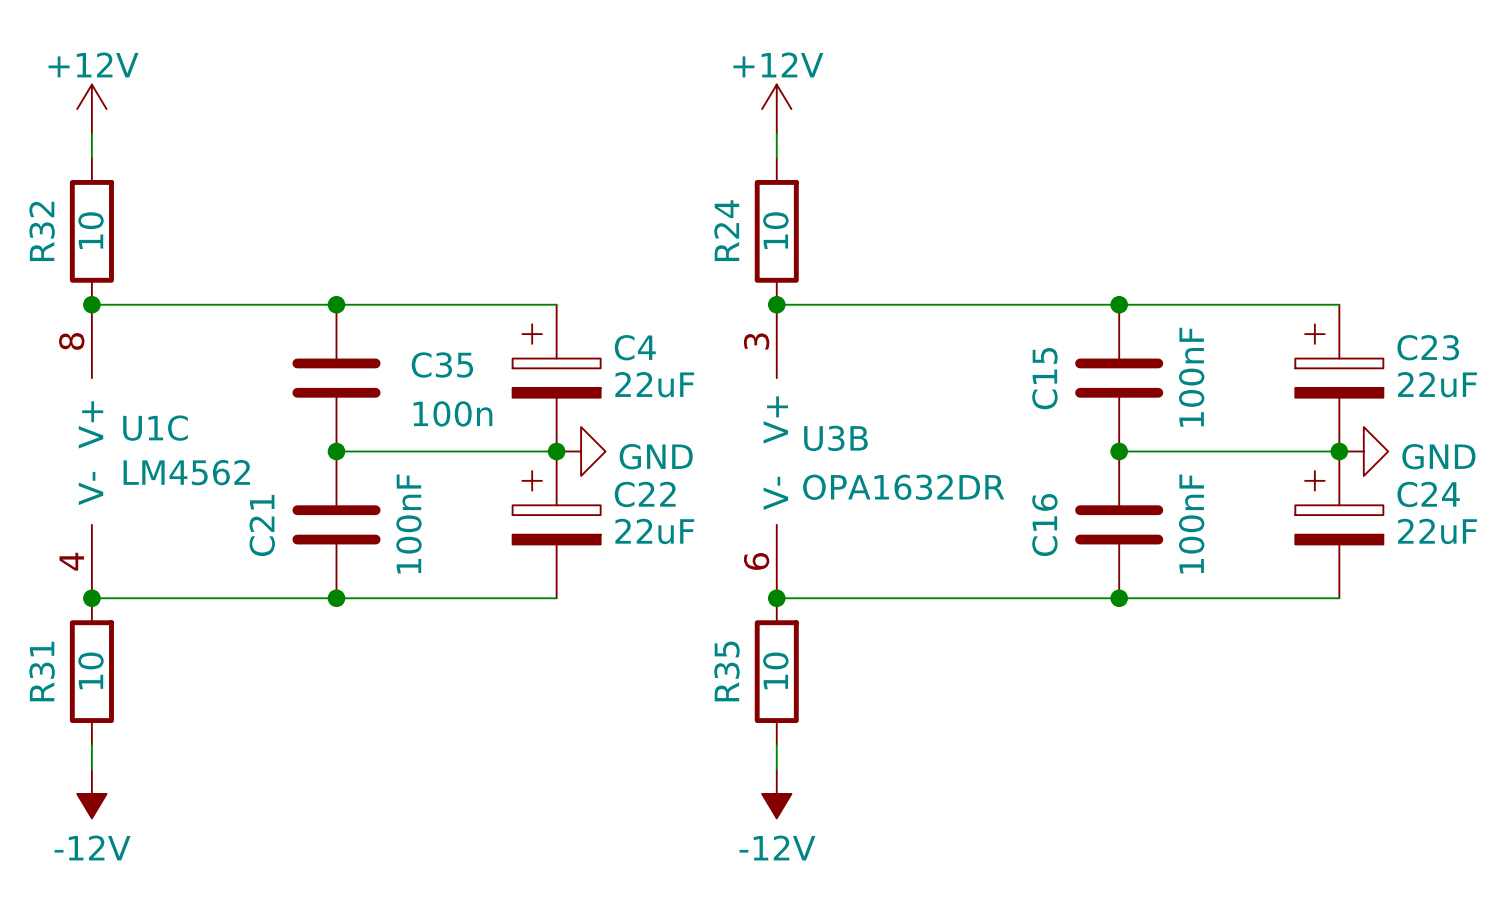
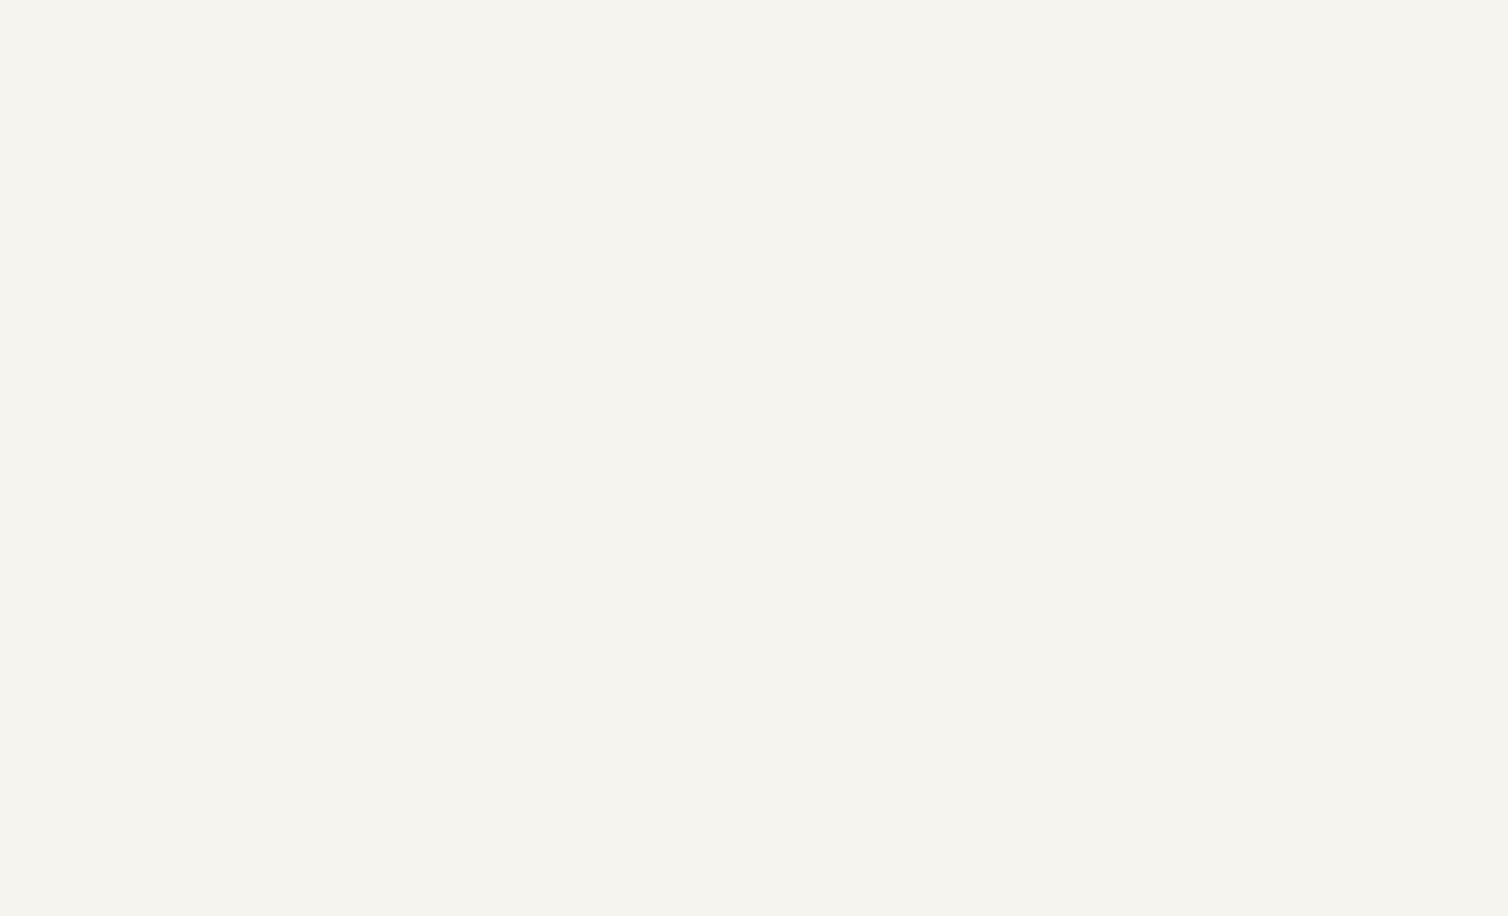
power symbol: +12V (91, 109) -> none
power symbol: +12V (776, 109) -> none
wire: (91, 133) (91, 157) -> none
wire: (776, 133) (776, 157) -> none
R32: 10 (91, 231) -> none
R24: 10 (776, 231) -> none
wire: (91, 304) (556, 304) -> none
junction: (91, 304) -> none
junction: (336, 304) -> none
wire: (776, 304) (1339, 304) -> none
junction: (776, 304) -> none
junction: (1119, 304) -> none
C35: 100n (336, 378) -> none
C4: 22uF (556, 378) -> none
C15: 100nF (1119, 378) -> none
C23: 22uF (1339, 378) -> none
U1C: LM4562 (91, 451) -> none
wire: (336, 451) (556, 451) -> none
junction: (336, 451) -> none
junction: (556, 451) -> none
power symbol: GND (581, 451) -> none
U3B: OPA1632DR (776, 451) -> none
wire: (1119, 451) (1339, 451) -> none
junction: (1119, 451) -> none
junction: (1339, 451) -> none
power symbol: GND (1363, 451) -> none
C21: 100nF (336, 524) -> none
C22: 22uF (556, 524) -> none
C16: 100nF (1119, 524) -> none
C24: 22uF (1339, 524) -> none
wire: (91, 598) (556, 598) -> none
junction: (91, 598) -> none
junction: (336, 598) -> none
wire: (776, 598) (1339, 598) -> none
junction: (776, 598) -> none
junction: (1119, 598) -> none
R31: 10 (91, 671) -> none
R35: 10 (776, 671) -> none
wire: (91, 745) (91, 769) -> none
wire: (776, 745) (776, 769) -> none
power symbol: -12V (91, 793) -> none
power symbol: -12V (776, 793) -> none

